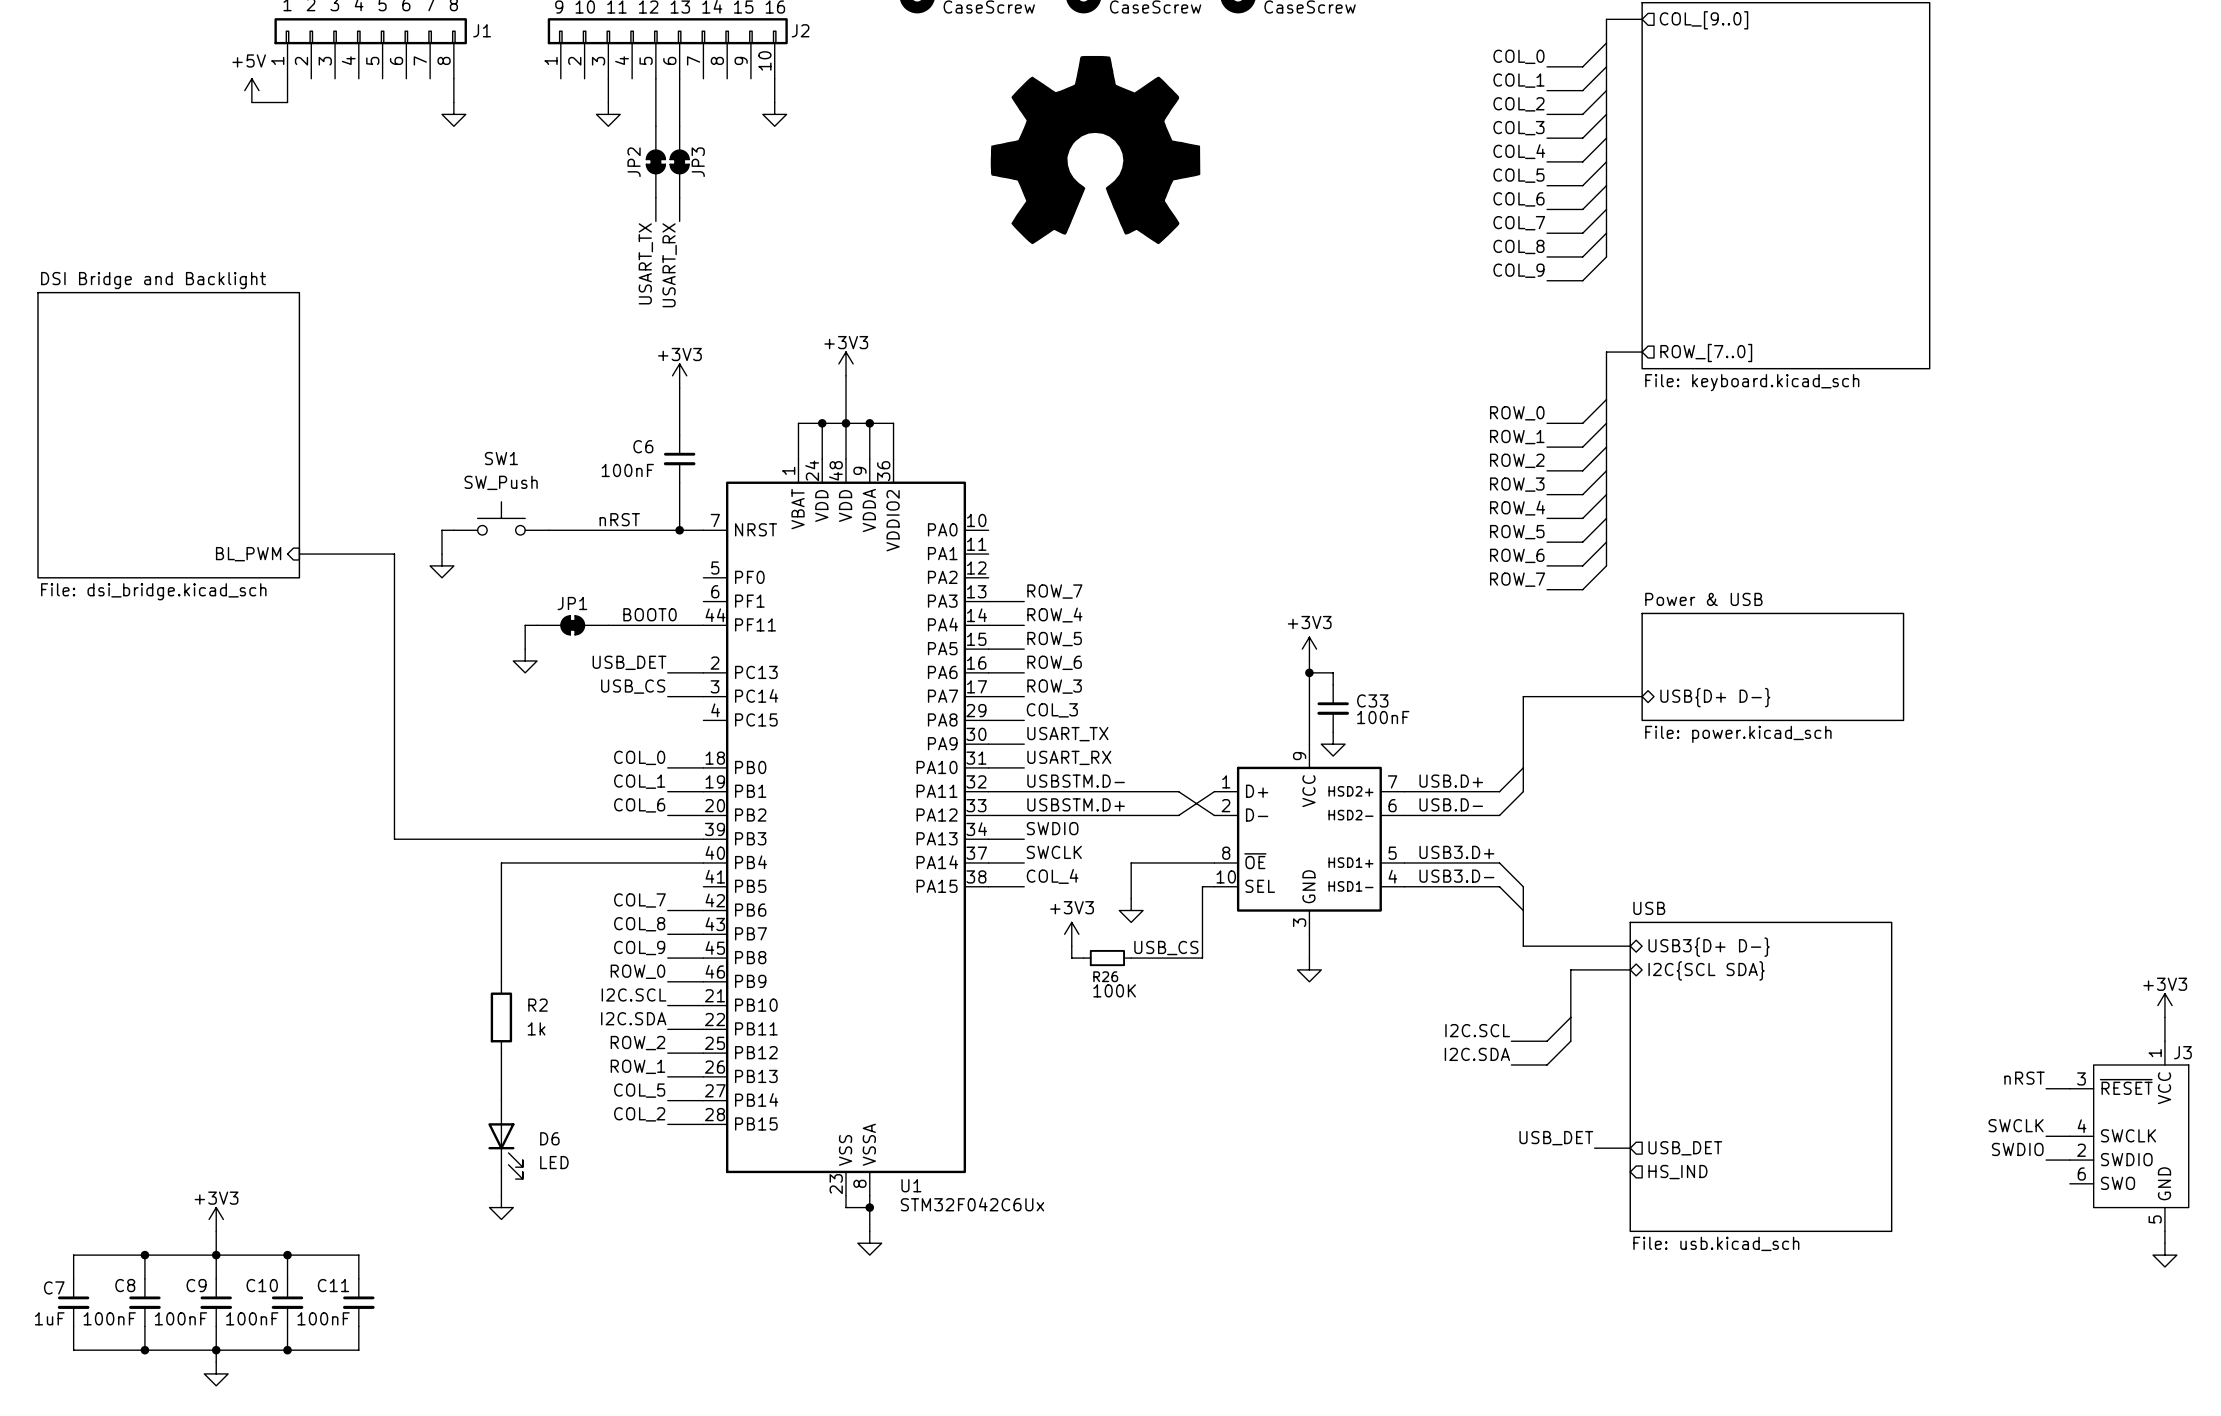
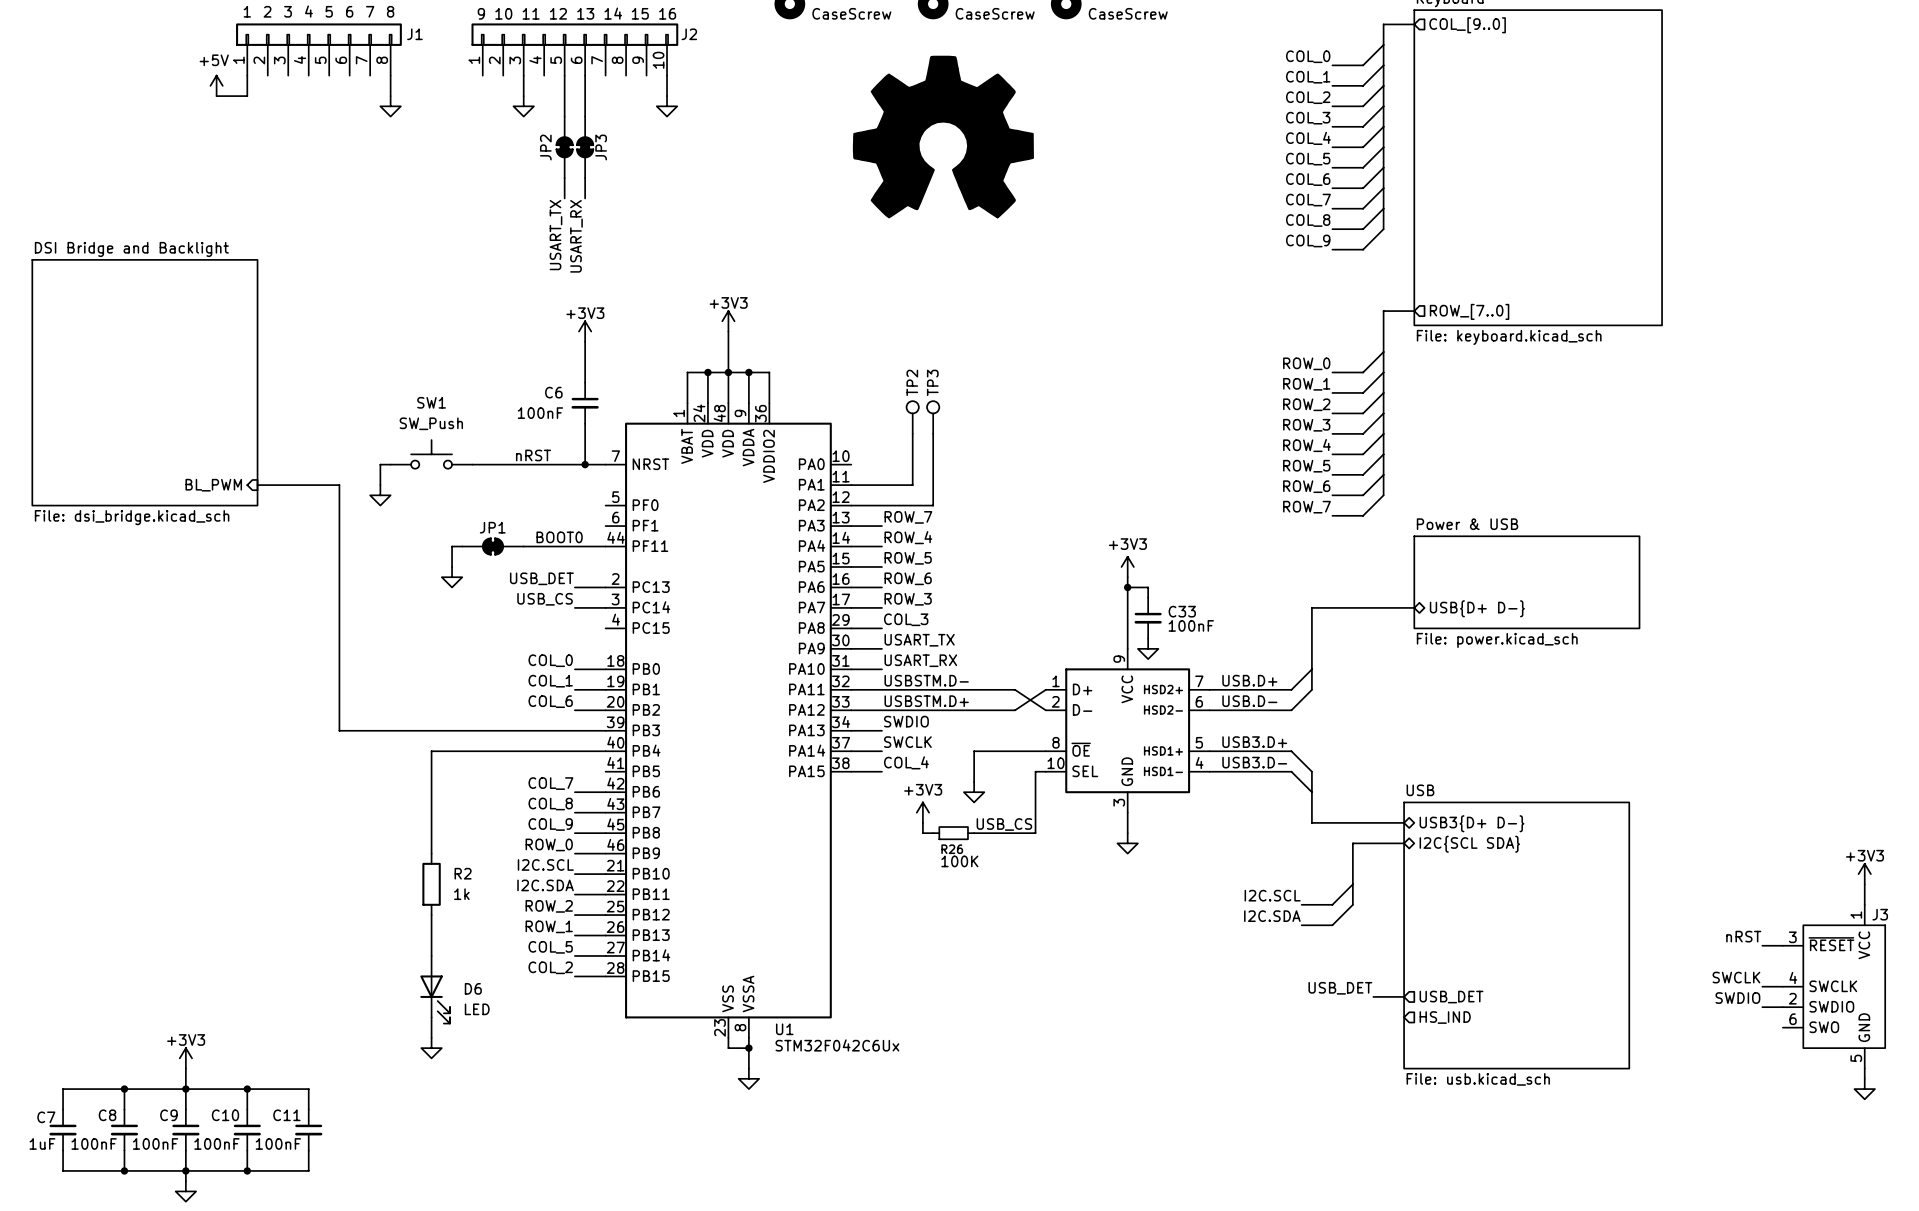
TP2: none -> (912, 417)
TP3: none -> (933, 417)
wire: none -> (912, 433) (912, 485) (851, 485)
wire: none -> (933, 433) (933, 505) (851, 505)

